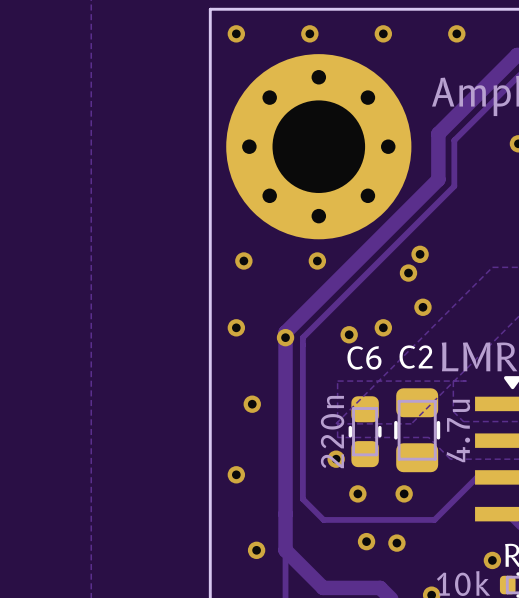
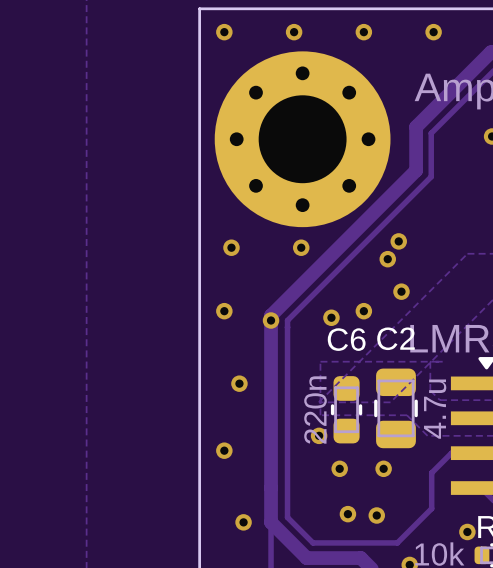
track: (477, 477) (434, 519) (323, 519) (302, 499) -> (452, 453) (431, 472) (431, 508) (397, 542) (313, 542) (287, 517) (287, 473)

